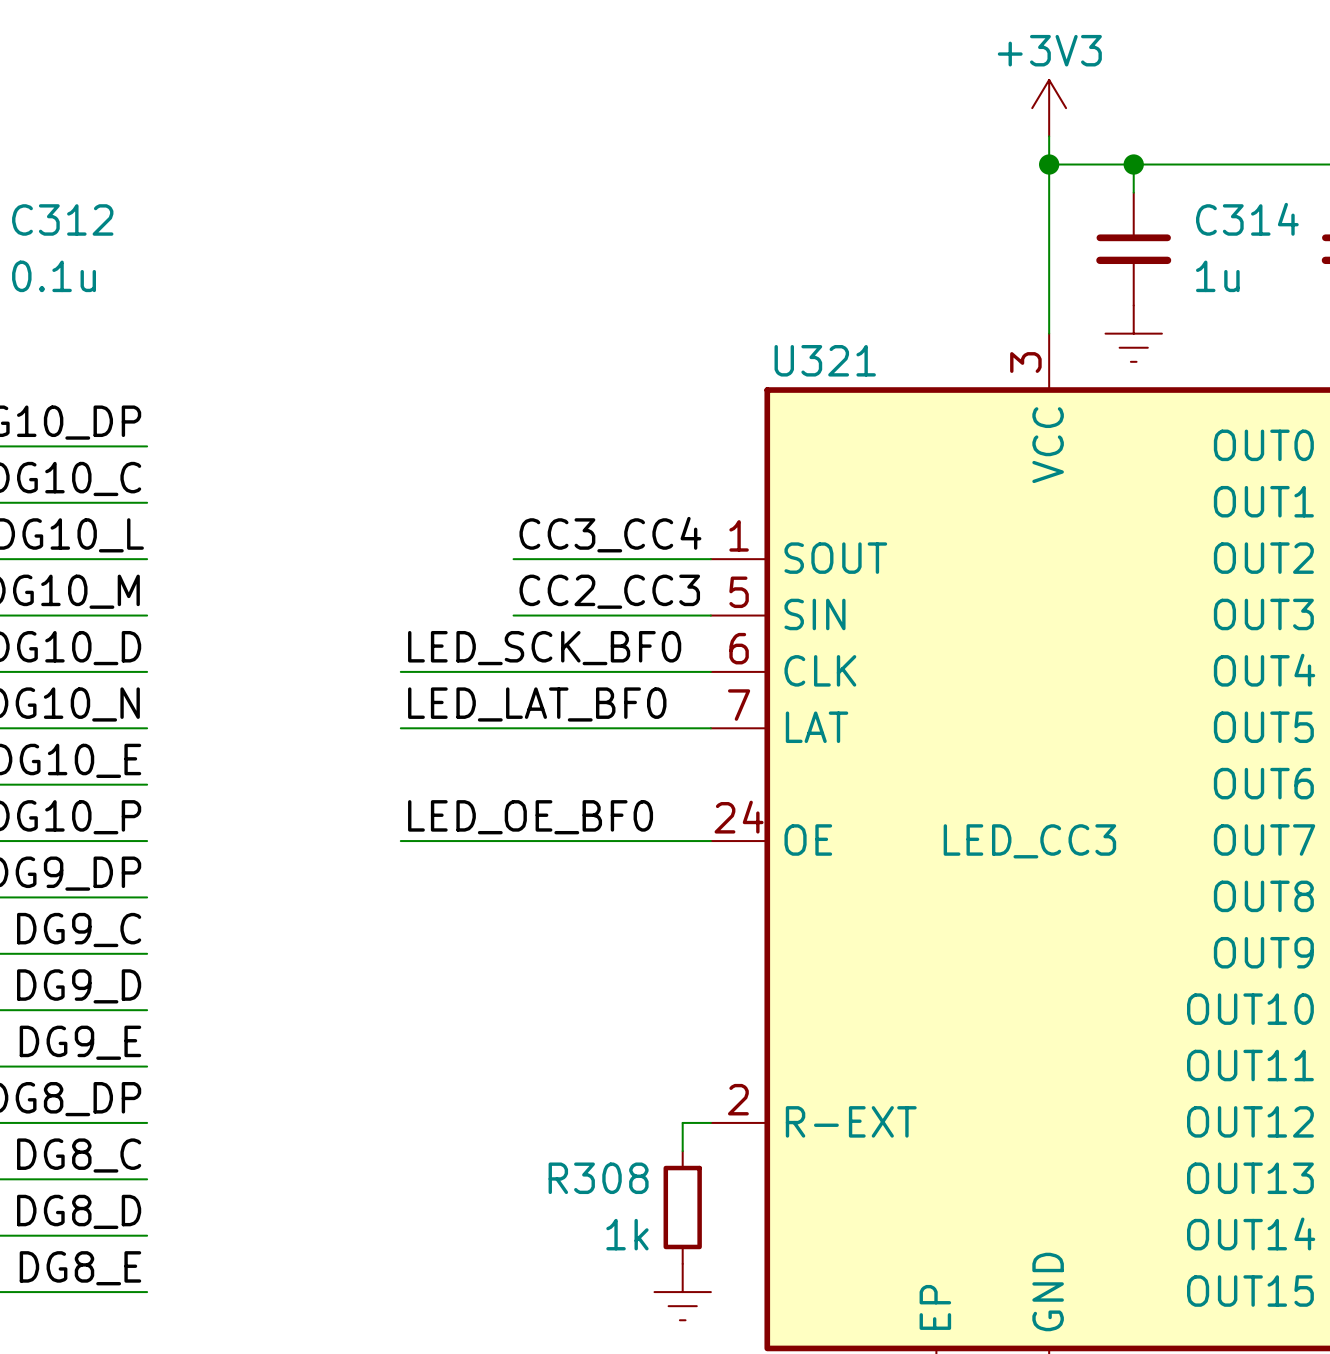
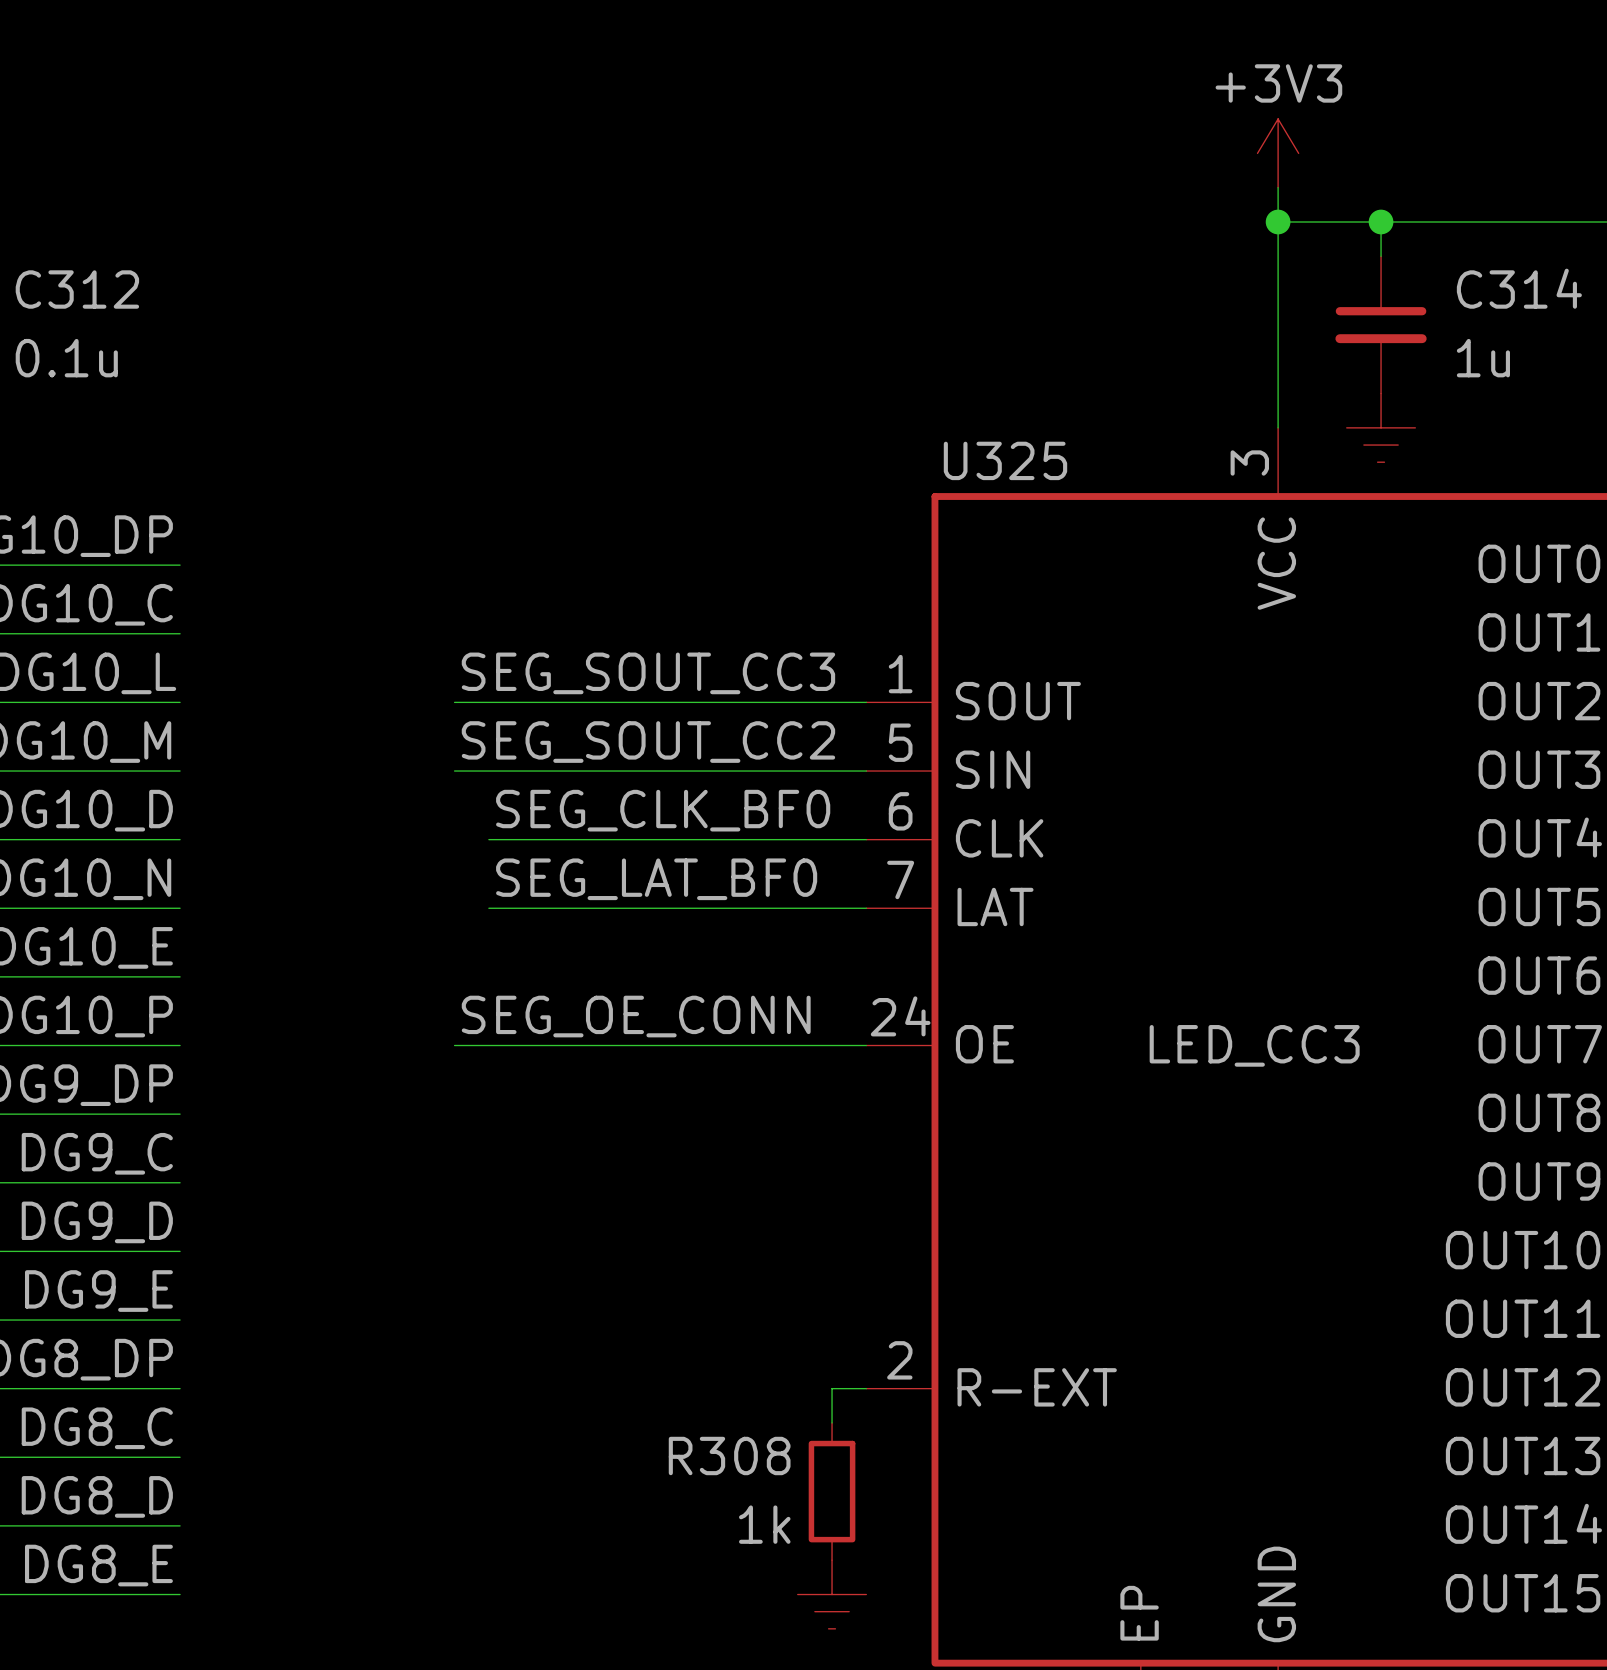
U321 name: U321 (825, 360) -> U325 (1005, 460)
label: CC3_CC4 (610, 534) -> none
label: none -> SEG_SOUT_CC3 (648, 673)
wire: none -> (454, 702) (626, 702)
label: none -> SEG_SOUT_CC2 (648, 742)
label: CC2_CC3 (609, 591) -> none
wire: none -> (454, 771) (626, 771)
label: LED_SCK_BF0 (544, 648) -> SEG_CLK_BF0 (663, 810)
label: LED_LAT_BF0 (537, 704) -> SEG_LAT_BF0 (656, 879)
label: none -> SEG_OE_CONN (636, 1016)
label: LED_OE_BF0 (530, 817) -> none
wire: none -> (454, 1045) (488, 1045)

